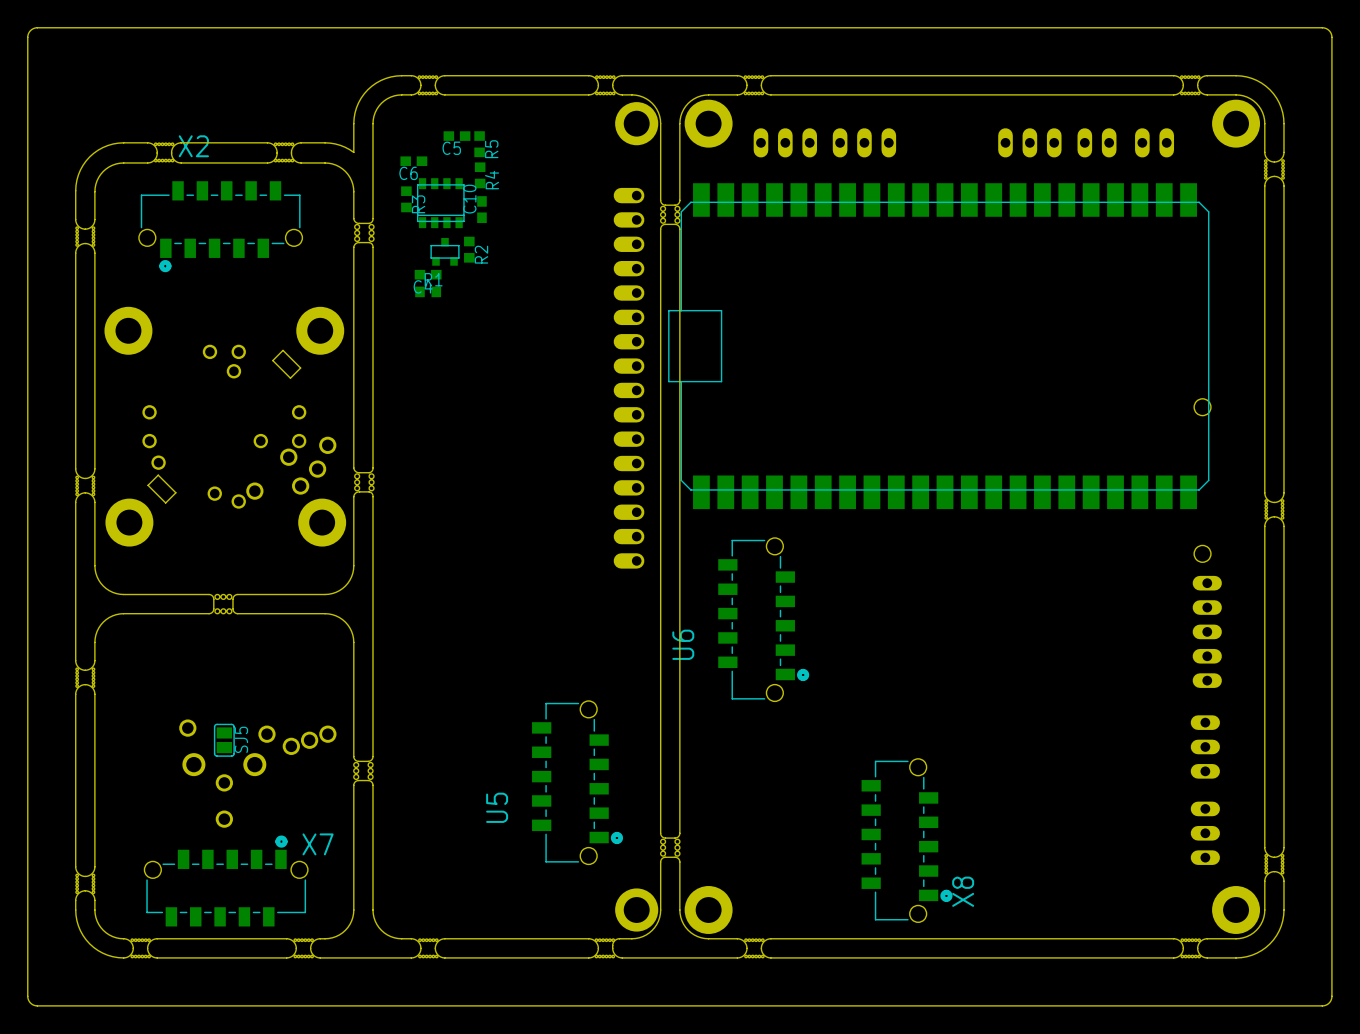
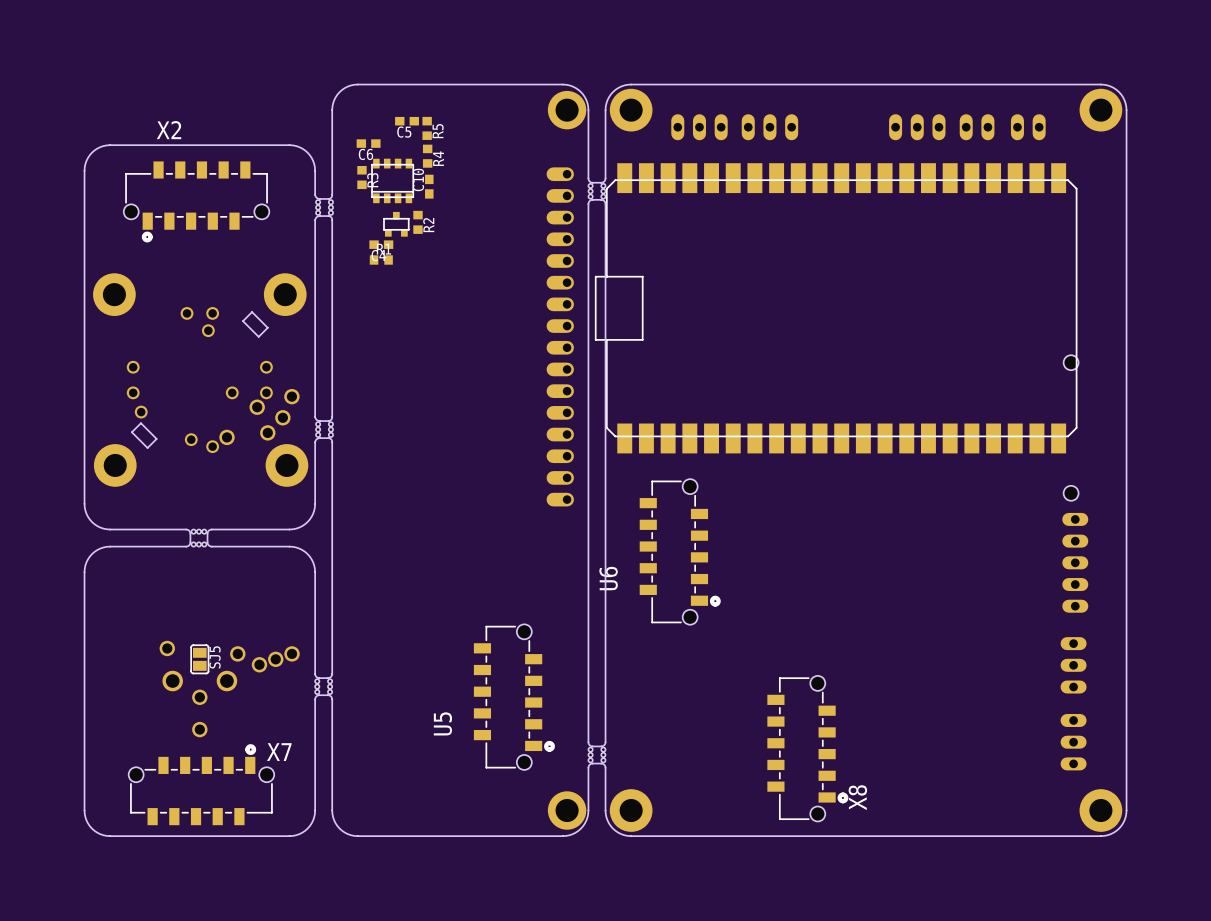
board edge: (1322, 27) (37, 27) (31, 29) (27, 37) (27, 996) (29, 1002) (37, 1005) (1322, 1005) (1328, 1003) (1331, 996) (1331, 37) (1329, 30) (1322, 27) -> none
hole: (419, 77) -> none
hole: (422, 77) -> none
hole: (426, 77) -> none
hole: (429, 77) -> none
hole: (432, 77) -> none
hole: (436, 77) -> none
hole: (596, 77) -> none
hole: (600, 77) -> none
hole: (603, 77) -> none
hole: (606, 77) -> none
hole: (610, 77) -> none
hole: (613, 77) -> none
hole: (745, 77) -> none
hole: (748, 77) -> none
hole: (752, 77) -> none
hole: (755, 77) -> none
hole: (758, 77) -> none
hole: (762, 77) -> none
hole: (1181, 77) -> none
hole: (1185, 77) -> none
hole: (1188, 77) -> none
hole: (1191, 77) -> none
hole: (1195, 77) -> none
hole: (1198, 77) -> none
hole: (419, 93) -> none
hole: (422, 93) -> none
hole: (426, 93) -> none
hole: (429, 93) -> none
hole: (432, 93) -> none
hole: (436, 93) -> none
hole: (596, 93) -> none
hole: (600, 93) -> none
hole: (603, 93) -> none
hole: (606, 93) -> none
hole: (610, 93) -> none
hole: (613, 93) -> none
hole: (745, 93) -> none
hole: (748, 93) -> none
hole: (752, 93) -> none
hole: (755, 93) -> none
hole: (758, 93) -> none
hole: (762, 93) -> none
hole: (1181, 93) -> none
hole: (1185, 93) -> none
hole: (1188, 93) -> none
hole: (1191, 93) -> none
hole: (1195, 93) -> none
hole: (1198, 93) -> none
board edge: (411, 94) (417, 92) (420, 86) (418, 79) (413, 76) (391, 76) (376, 83) (364, 93) (356, 107) (354, 118) (353, 152) (335, 143) (298, 143) (292, 147) (291, 154) (295, 161) (301, 162) -> (366, 84) (396, 84)
board edge: (588, 94) (595, 92) (598, 85) (595, 78) (588, 75) (443, 75) (437, 79) (435, 85) (438, 92) (444, 94) -> (524, 84) (554, 84)
board edge: (737, 94) (744, 92) (746, 85) (744, 78) (737, 75) (621, 75) (614, 79) (612, 85) (615, 92) (622, 94) -> (656, 84) (686, 84)
board edge: (1173, 94) (1180, 92) (1183, 85) (1180, 78) (1173, 75) (770, 75) (764, 78) (761, 85) (764, 92) (770, 94) -> none
board edge: (1207, 94) (1200, 92) (1197, 85) (1199, 79) (1206, 75) (1246, 76) (1261, 83) (1269, 89) (1276, 98) (1282, 112) (1283, 153) (1280, 160) (1274, 162) (1267, 159) (1264, 152) -> (1075, 84) (1045, 84)
hole: (155, 144) -> none
hole: (159, 144) -> none
hole: (162, 144) -> none
hole: (165, 144) -> none
hole: (169, 144) -> none
hole: (172, 144) -> none
hole: (275, 144) -> none
hole: (279, 144) -> none
hole: (282, 144) -> none
hole: (285, 144) -> none
hole: (289, 144) -> none
hole: (292, 144) -> none
hole: (155, 160) -> none
hole: (159, 160) -> none
hole: (162, 160) -> none
hole: (165, 160) -> none
hole: (169, 160) -> none
hole: (172, 160) -> none
hole: (275, 160) -> none
hole: (279, 160) -> none
hole: (282, 160) -> none
hole: (285, 160) -> none
hole: (289, 160) -> none
hole: (292, 160) -> none
hole: (1265, 161) -> none
hole: (1283, 161) -> none
board edge: (147, 162) (154, 160) (157, 153) (155, 146) (148, 142) (112, 144) (98, 150) (89, 156) (83, 165) (76, 180) (75, 220) (79, 227) (85, 229) (92, 226) (94, 219) -> (131, 145) (161, 145)
board edge: (267, 162) (274, 160) (277, 153) (274, 145) (267, 142) (178, 143) (172, 147) (171, 154) (175, 161) (181, 162) -> (238, 145) (268, 145)
hole: (1265, 164) -> none
hole: (1283, 164) -> none
hole: (1265, 167) -> none
hole: (1283, 167) -> none
hole: (1265, 171) -> none
hole: (1283, 171) -> none
hole: (1265, 174) -> none
hole: (1283, 174) -> none
hole: (1265, 177) -> none
hole: (1283, 177) -> none
board edge: (1264, 185) (1267, 179) (1274, 176) (1281, 179) (1283, 185) (1283, 492) (1281, 499) (1274, 502) (1267, 499) (1264, 492) -> (1126, 165) (1126, 135)
hole: (77, 228) -> none
hole: (93, 228) -> none
hole: (77, 231) -> none
hole: (93, 231) -> none
hole: (77, 234) -> none
hole: (93, 234) -> none
hole: (77, 238) -> none
hole: (93, 238) -> none
hole: (77, 241) -> none
hole: (93, 241) -> none
hole: (77, 244) -> none
hole: (93, 244) -> none
board edge: (94, 253) (92, 246) (85, 243) (78, 246) (75, 253) (75, 470) (79, 476) (85, 478) (92, 475) (94, 468) -> (84, 225) (84, 195)
hole: (77, 477) -> none
hole: (93, 477) -> none
hole: (77, 480) -> none
hole: (93, 480) -> none
hole: (77, 484) -> none
hole: (93, 484) -> none
hole: (77, 487) -> none
hole: (93, 487) -> none
hole: (77, 490) -> none
hole: (93, 490) -> none
hole: (77, 494) -> none
hole: (93, 494) -> none
hole: (1266, 501) -> none
hole: (1282, 501) -> none
board edge: (94, 502) (92, 495) (85, 492) (78, 495) (75, 502) (75, 661) (79, 668) (85, 670) (92, 667) (94, 660) -> (84, 447) (84, 417)
hole: (1266, 504) -> none
hole: (1282, 504) -> none
hole: (1266, 507) -> none
hole: (1282, 507) -> none
hole: (1266, 511) -> none
hole: (1282, 511) -> none
hole: (1266, 514) -> none
hole: (1282, 514) -> none
hole: (1266, 517) -> none
hole: (1282, 517) -> none
board edge: (1264, 526) (1267, 519) (1274, 516) (1281, 519) (1283, 526) (1283, 847) (1281, 854) (1274, 857) (1267, 854) (1264, 847) -> (1126, 468) (1126, 438)
hole: (77, 669) -> none
hole: (93, 669) -> none
hole: (77, 672) -> none
hole: (93, 672) -> none
hole: (77, 676) -> none
hole: (93, 676) -> none
hole: (77, 679) -> none
hole: (93, 679) -> none
hole: (77, 682) -> none
hole: (93, 682) -> none
hole: (77, 686) -> none
hole: (93, 686) -> none
board edge: (94, 694) (92, 687) (85, 684) (78, 687) (75, 694) (75, 868) (79, 874) (85, 876) (92, 873) (94, 866) -> (84, 618) (84, 588)
hole: (1266, 855) -> none
hole: (1282, 855) -> none
hole: (1266, 859) -> none
hole: (1282, 859) -> none
hole: (1266, 862) -> none
hole: (1282, 862) -> none
hole: (1266, 865) -> none
hole: (1282, 865) -> none
board edge: none -> (84, 772) (84, 801)
hole: (1266, 869) -> none
hole: (1282, 869) -> none
hole: (1266, 872) -> none
hole: (1282, 872) -> none
hole: (77, 875) -> none
hole: (93, 875) -> none
hole: (77, 878) -> none
hole: (93, 878) -> none
board edge: (1264, 881) (1267, 874) (1274, 871) (1280, 873) (1283, 879) (1282, 920) (1276, 935) (1269, 943) (1261, 950) (1246, 956) (1206, 957) (1199, 954) (1197, 948) (1200, 941) (1207, 938) -> (1126, 784) (1126, 755)
hole: (77, 882) -> none
hole: (93, 882) -> none
hole: (77, 885) -> none
hole: (93, 885) -> none
hole: (77, 888) -> none
hole: (93, 888) -> none
hole: (77, 892) -> none
hole: (93, 892) -> none
board edge: (94, 900) (92, 894) (86, 890) (79, 892) (76, 897) (76, 920) (86, 939) (102, 953) (123, 957) (130, 955) (133, 948) (130, 941) (123, 938) -> (140, 836) (110, 836)
board edge: (286, 938) (293, 941) (296, 948) (293, 955) (286, 957) (155, 957) (149, 954) (147, 948) (150, 941) (157, 938) -> (255, 836) (285, 836)
board edge: (411, 938) (418, 941) (420, 948) (418, 955) (411, 957) (317, 957) (312, 954) (310, 947) (314, 940) (320, 938) -> (366, 836) (396, 836)
board edge: (588, 938) (595, 941) (598, 948) (595, 955) (588, 957) (443, 957) (437, 954) (435, 948) (438, 941) (444, 938) -> none
board edge: (737, 938) (744, 941) (746, 948) (744, 955) (737, 957) (621, 957) (615, 955) (612, 949) (613, 942) (619, 938) -> (524, 836) (551, 836)
board edge: none -> (686, 836) (656, 836)
board edge: (1173, 938) (1180, 941) (1183, 948) (1180, 955) (1173, 957) (770, 957) (764, 955) (761, 948) (764, 941) (770, 938) -> (1045, 836) (1075, 836)
hole: (132, 940) -> none
hole: (135, 940) -> none
hole: (139, 940) -> none
hole: (142, 940) -> none
hole: (145, 940) -> none
hole: (149, 940) -> none
hole: (295, 940) -> none
hole: (298, 940) -> none
hole: (302, 940) -> none
hole: (305, 940) -> none
hole: (308, 940) -> none
hole: (312, 940) -> none
hole: (419, 940) -> none
hole: (423, 940) -> none
hole: (426, 940) -> none
hole: (430, 940) -> none
hole: (433, 940) -> none
hole: (436, 940) -> none
hole: (596, 940) -> none
hole: (599, 940) -> none
hole: (603, 940) -> none
hole: (606, 940) -> none
hole: (609, 940) -> none
hole: (613, 940) -> none
hole: (746, 940) -> none
hole: (749, 940) -> none
hole: (752, 940) -> none
hole: (756, 940) -> none
hole: (759, 940) -> none
hole: (762, 940) -> none
hole: (1182, 940) -> none
hole: (1185, 940) -> none
hole: (1189, 940) -> none
hole: (1192, 940) -> none
hole: (1195, 940) -> none
hole: (1199, 940) -> none
hole: (132, 956) -> none
hole: (135, 956) -> none
hole: (139, 956) -> none
hole: (142, 956) -> none
hole: (145, 956) -> none
hole: (149, 956) -> none
hole: (295, 956) -> none
hole: (298, 956) -> none
hole: (302, 956) -> none
hole: (305, 956) -> none
hole: (308, 956) -> none
hole: (312, 956) -> none
hole: (419, 956) -> none
hole: (423, 956) -> none
hole: (426, 956) -> none
hole: (430, 956) -> none
hole: (433, 956) -> none
hole: (436, 956) -> none
hole: (596, 956) -> none
hole: (599, 956) -> none
hole: (603, 956) -> none
hole: (606, 956) -> none
hole: (609, 956) -> none
hole: (613, 956) -> none
hole: (746, 956) -> none
hole: (749, 956) -> none
hole: (752, 956) -> none
hole: (756, 956) -> none
hole: (759, 956) -> none
hole: (762, 956) -> none
hole: (1182, 956) -> none
hole: (1185, 956) -> none
hole: (1189, 956) -> none
hole: (1192, 956) -> none
hole: (1195, 956) -> none
hole: (1199, 956) -> none

